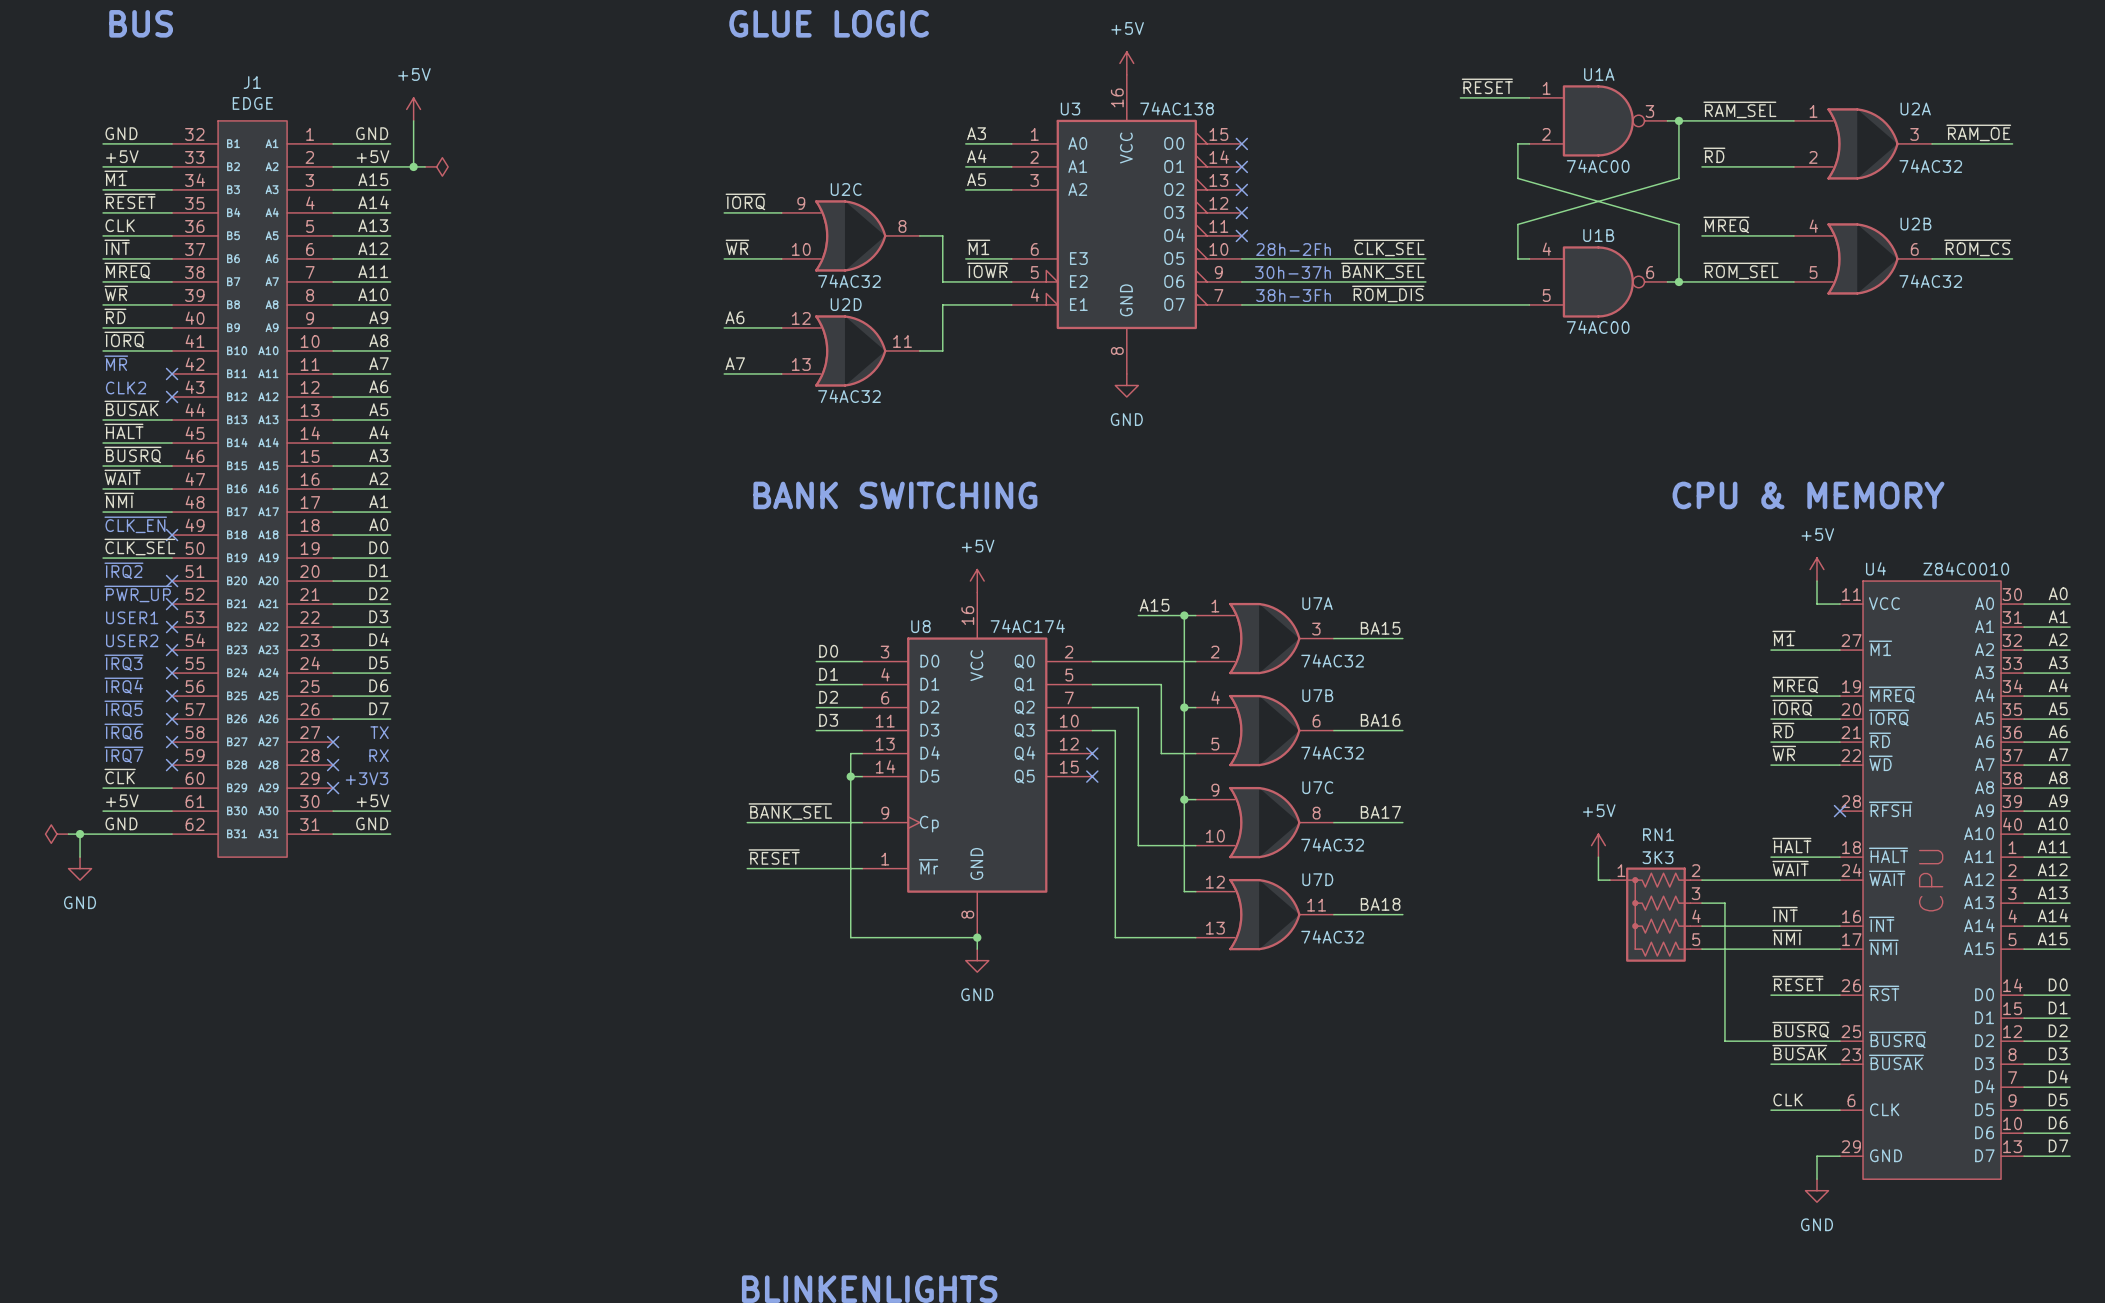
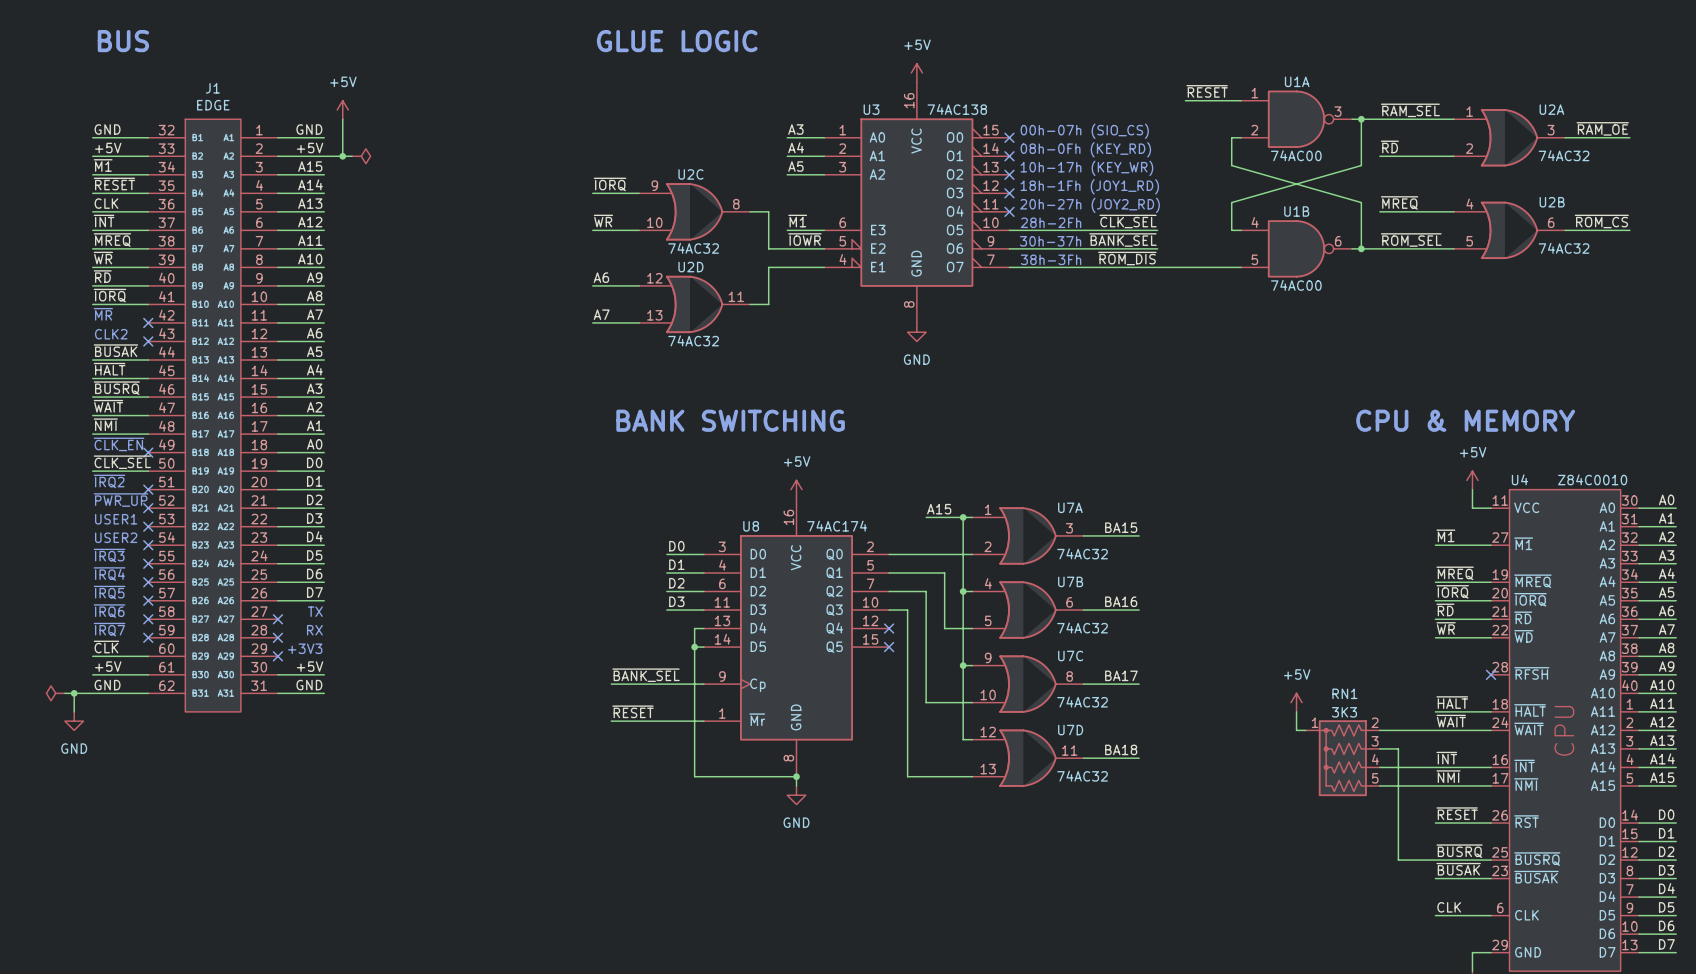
text: none -> 00h-07h (SIO_CS) (1084, 131)
text: none -> 08h-0Fh (KEY_RD) (1085, 149)
text: none -> 10h-17h (KEY_WR) (1086, 168)
text: none -> 18h-1Fh (JOY1_RD) (1089, 186)
text: none -> 20h-27h (JOY2_RD) (1090, 205)

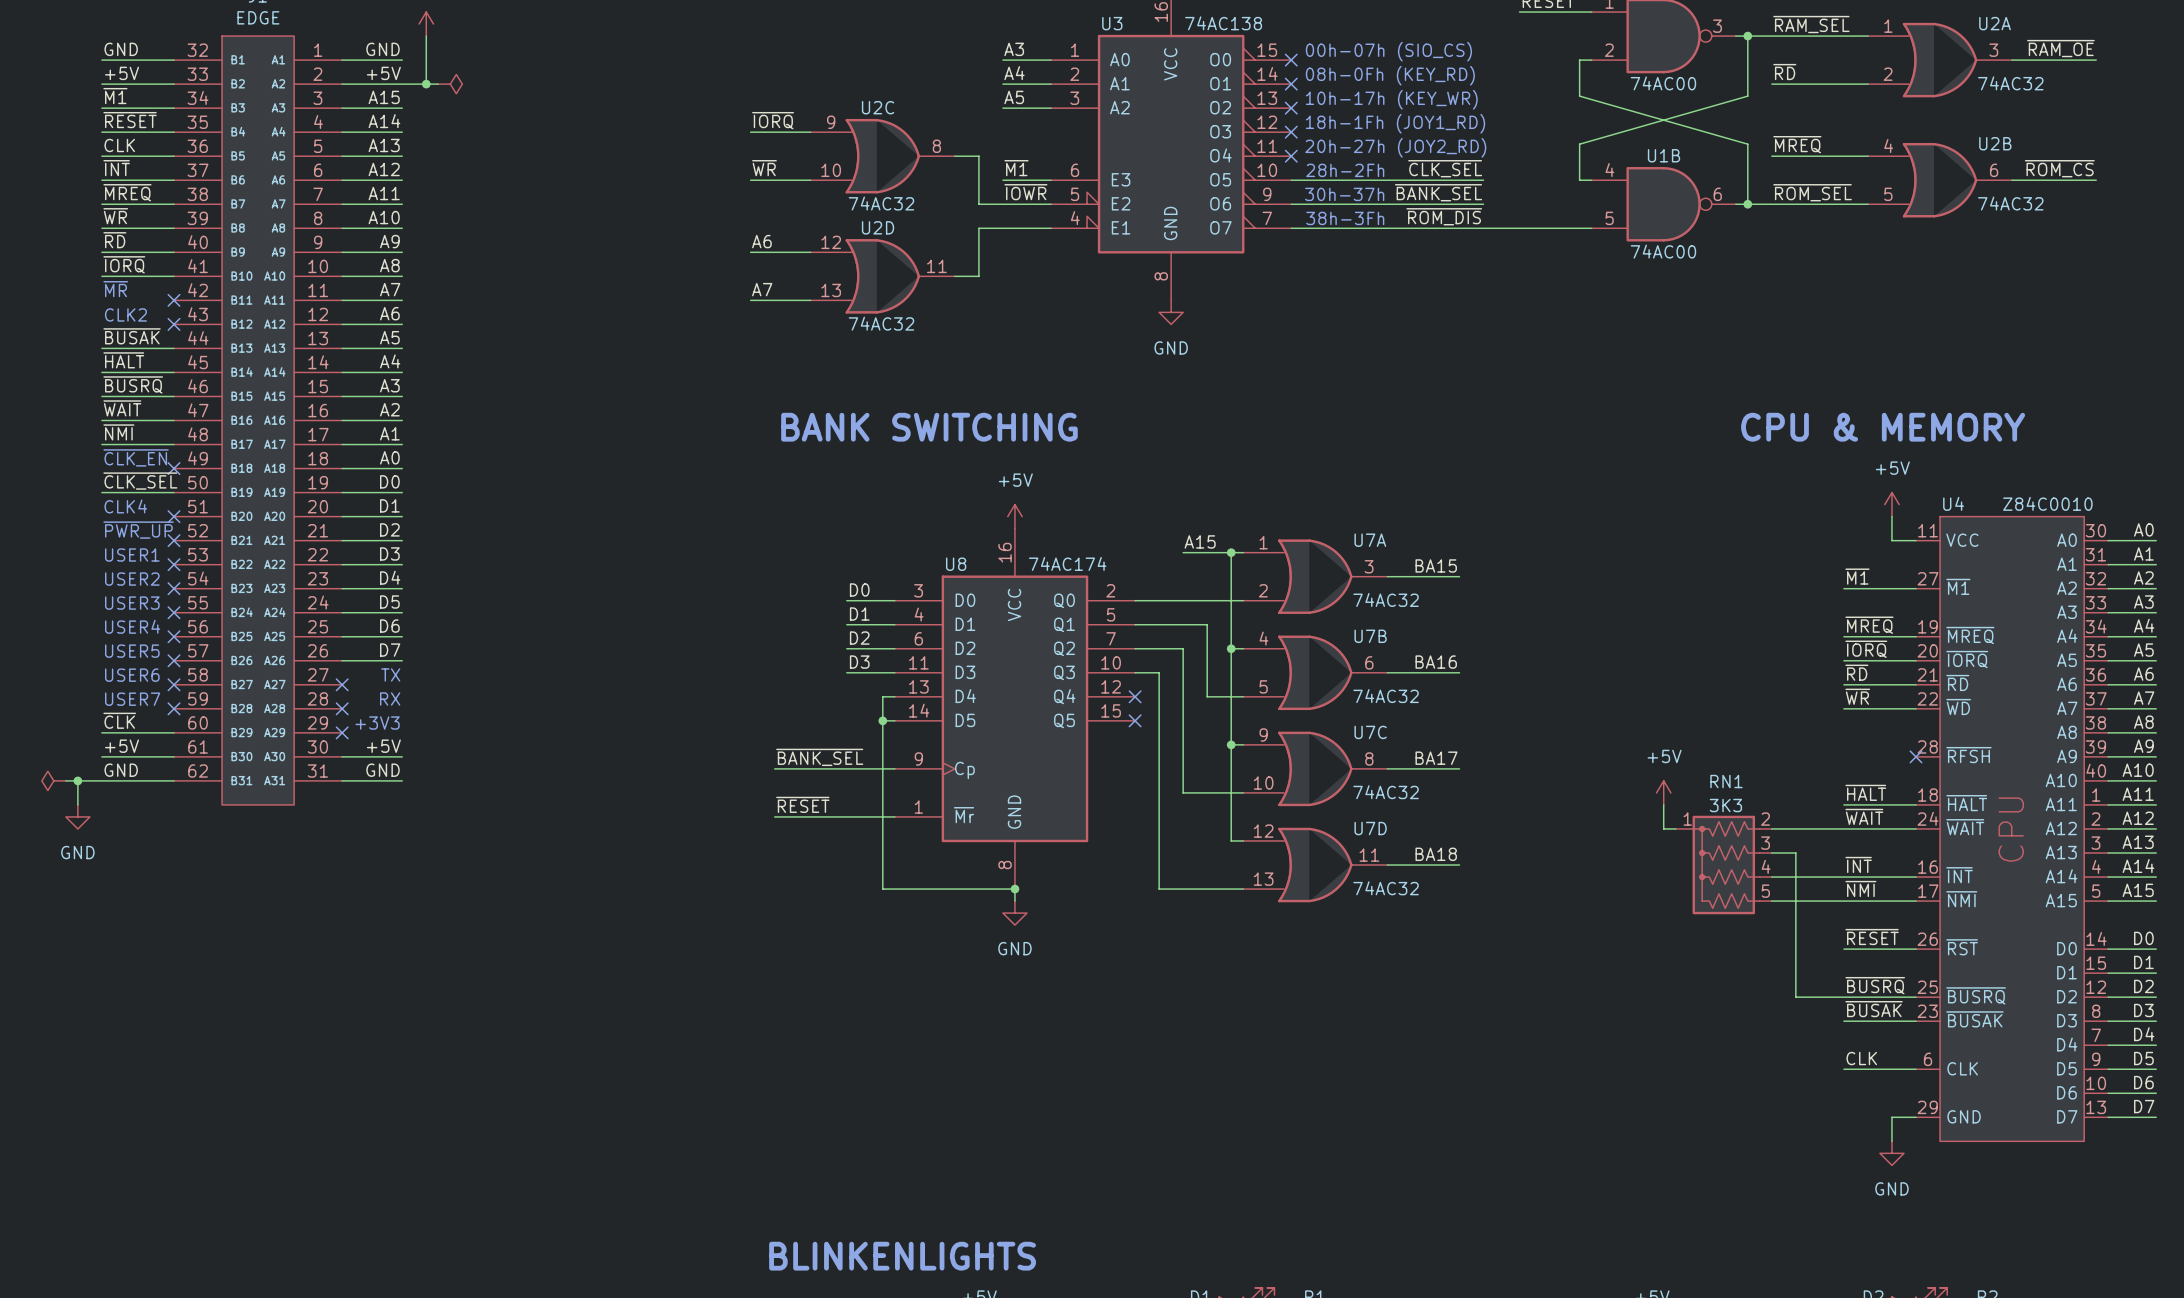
text: ~{IRQ2} (109, 481) -> CLK4 (125, 506)
text: ~{IRQ3} (109, 555) -> USER3 (132, 603)
text: ~{IRQ4} (109, 574) -> USER4 (132, 626)
text: ~{IRQ5} (109, 592) -> USER5 (132, 651)
text: ~{IRQ6} (109, 611) -> USER6 (132, 675)
text: ~{IRQ7} (109, 629) -> USER7 (132, 699)

